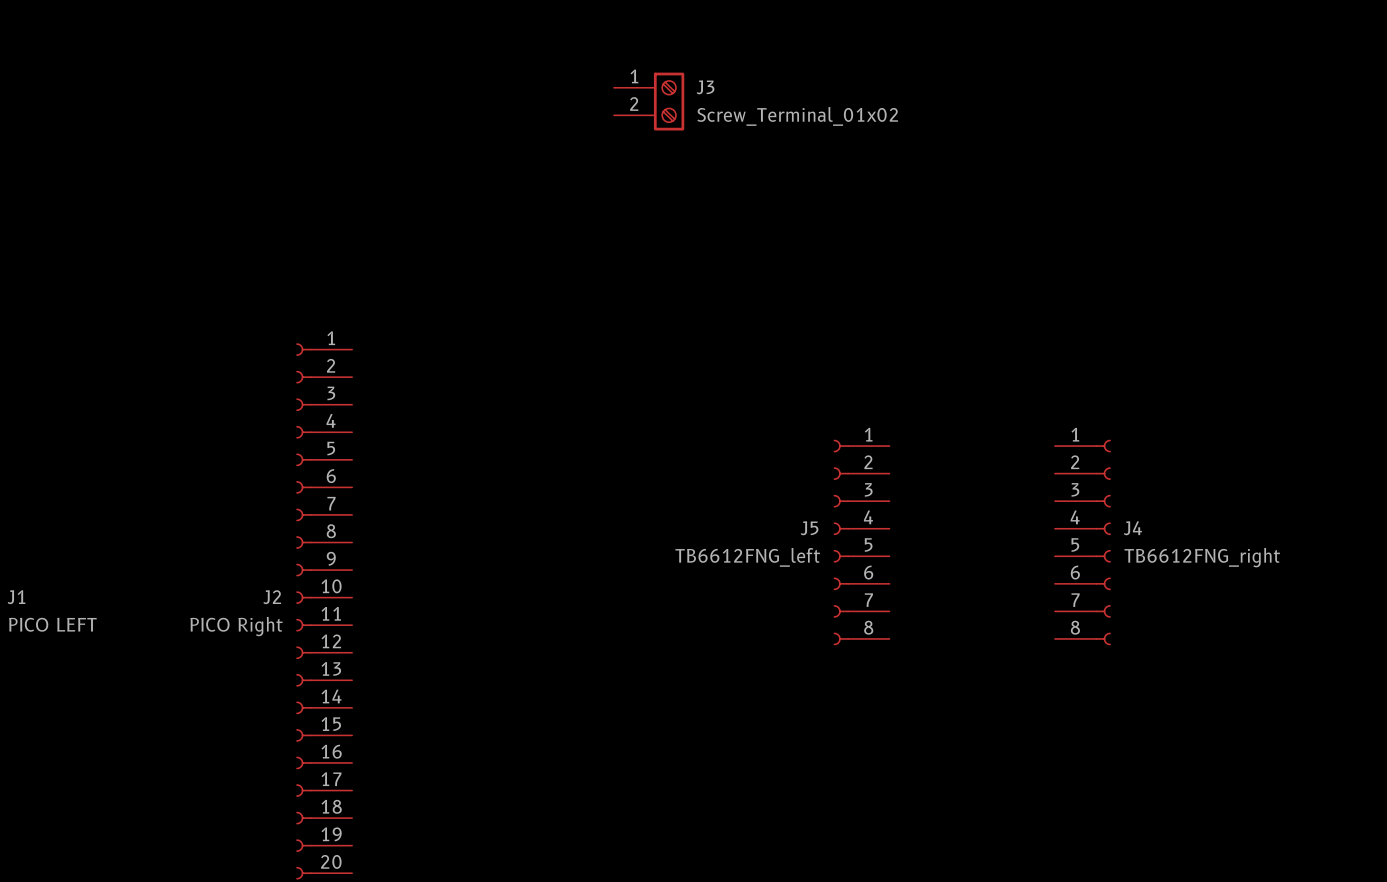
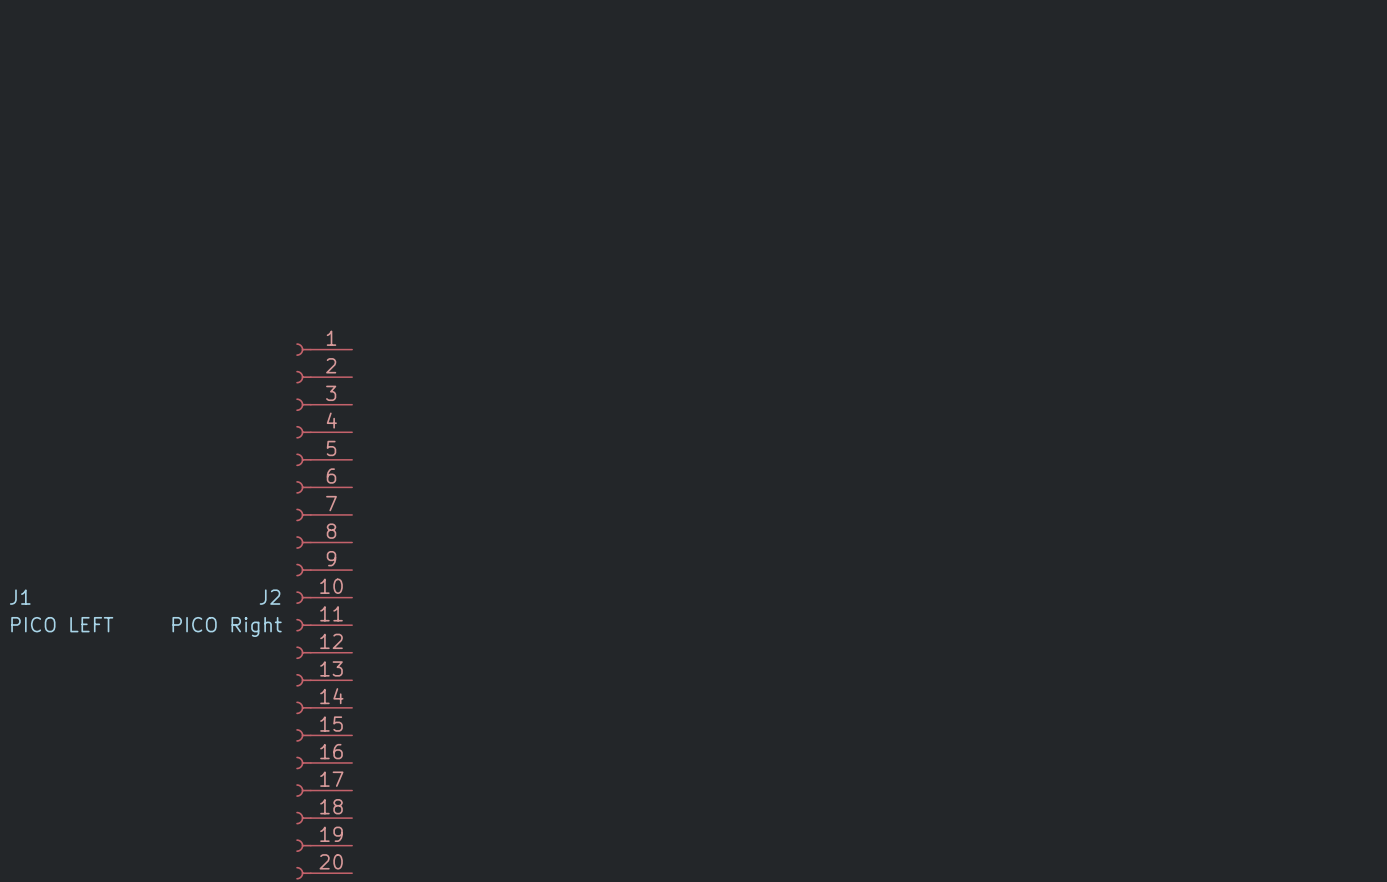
J3: Screw_Terminal_01x02 (649, 101) -> none
J5: TB6612FNG_left (861, 542) -> none
J4: TB6612FNG_right (1082, 542) -> none

